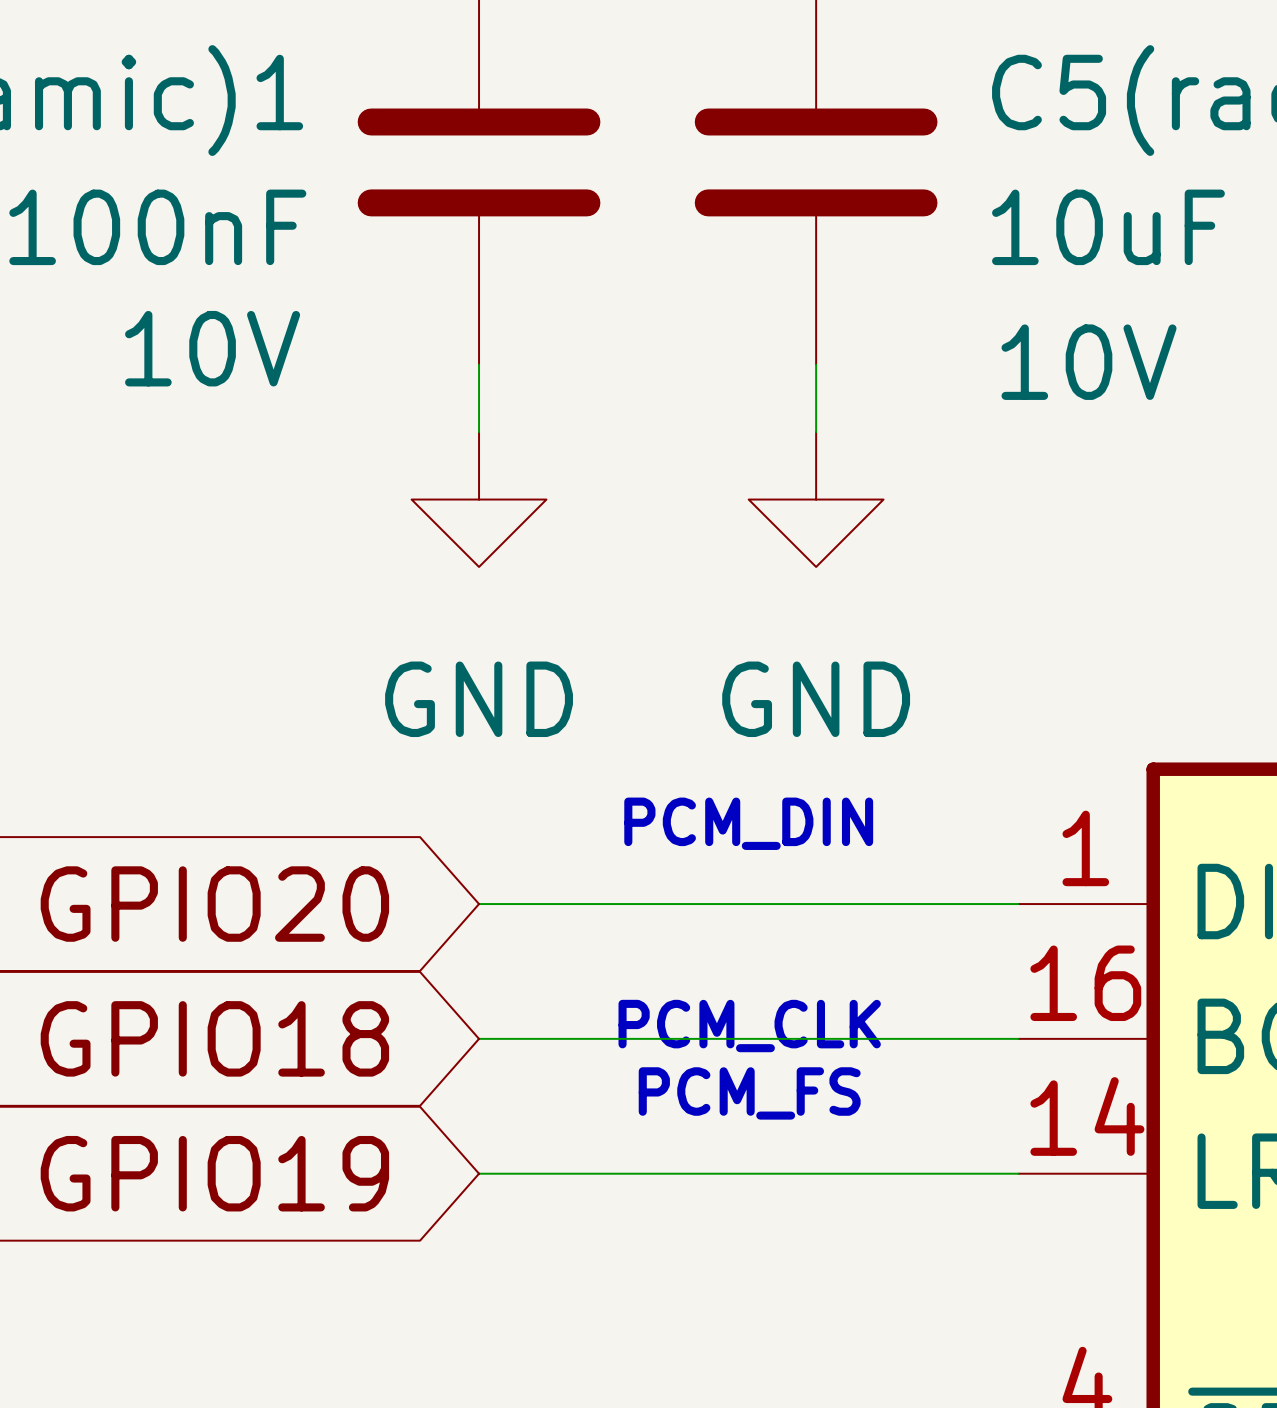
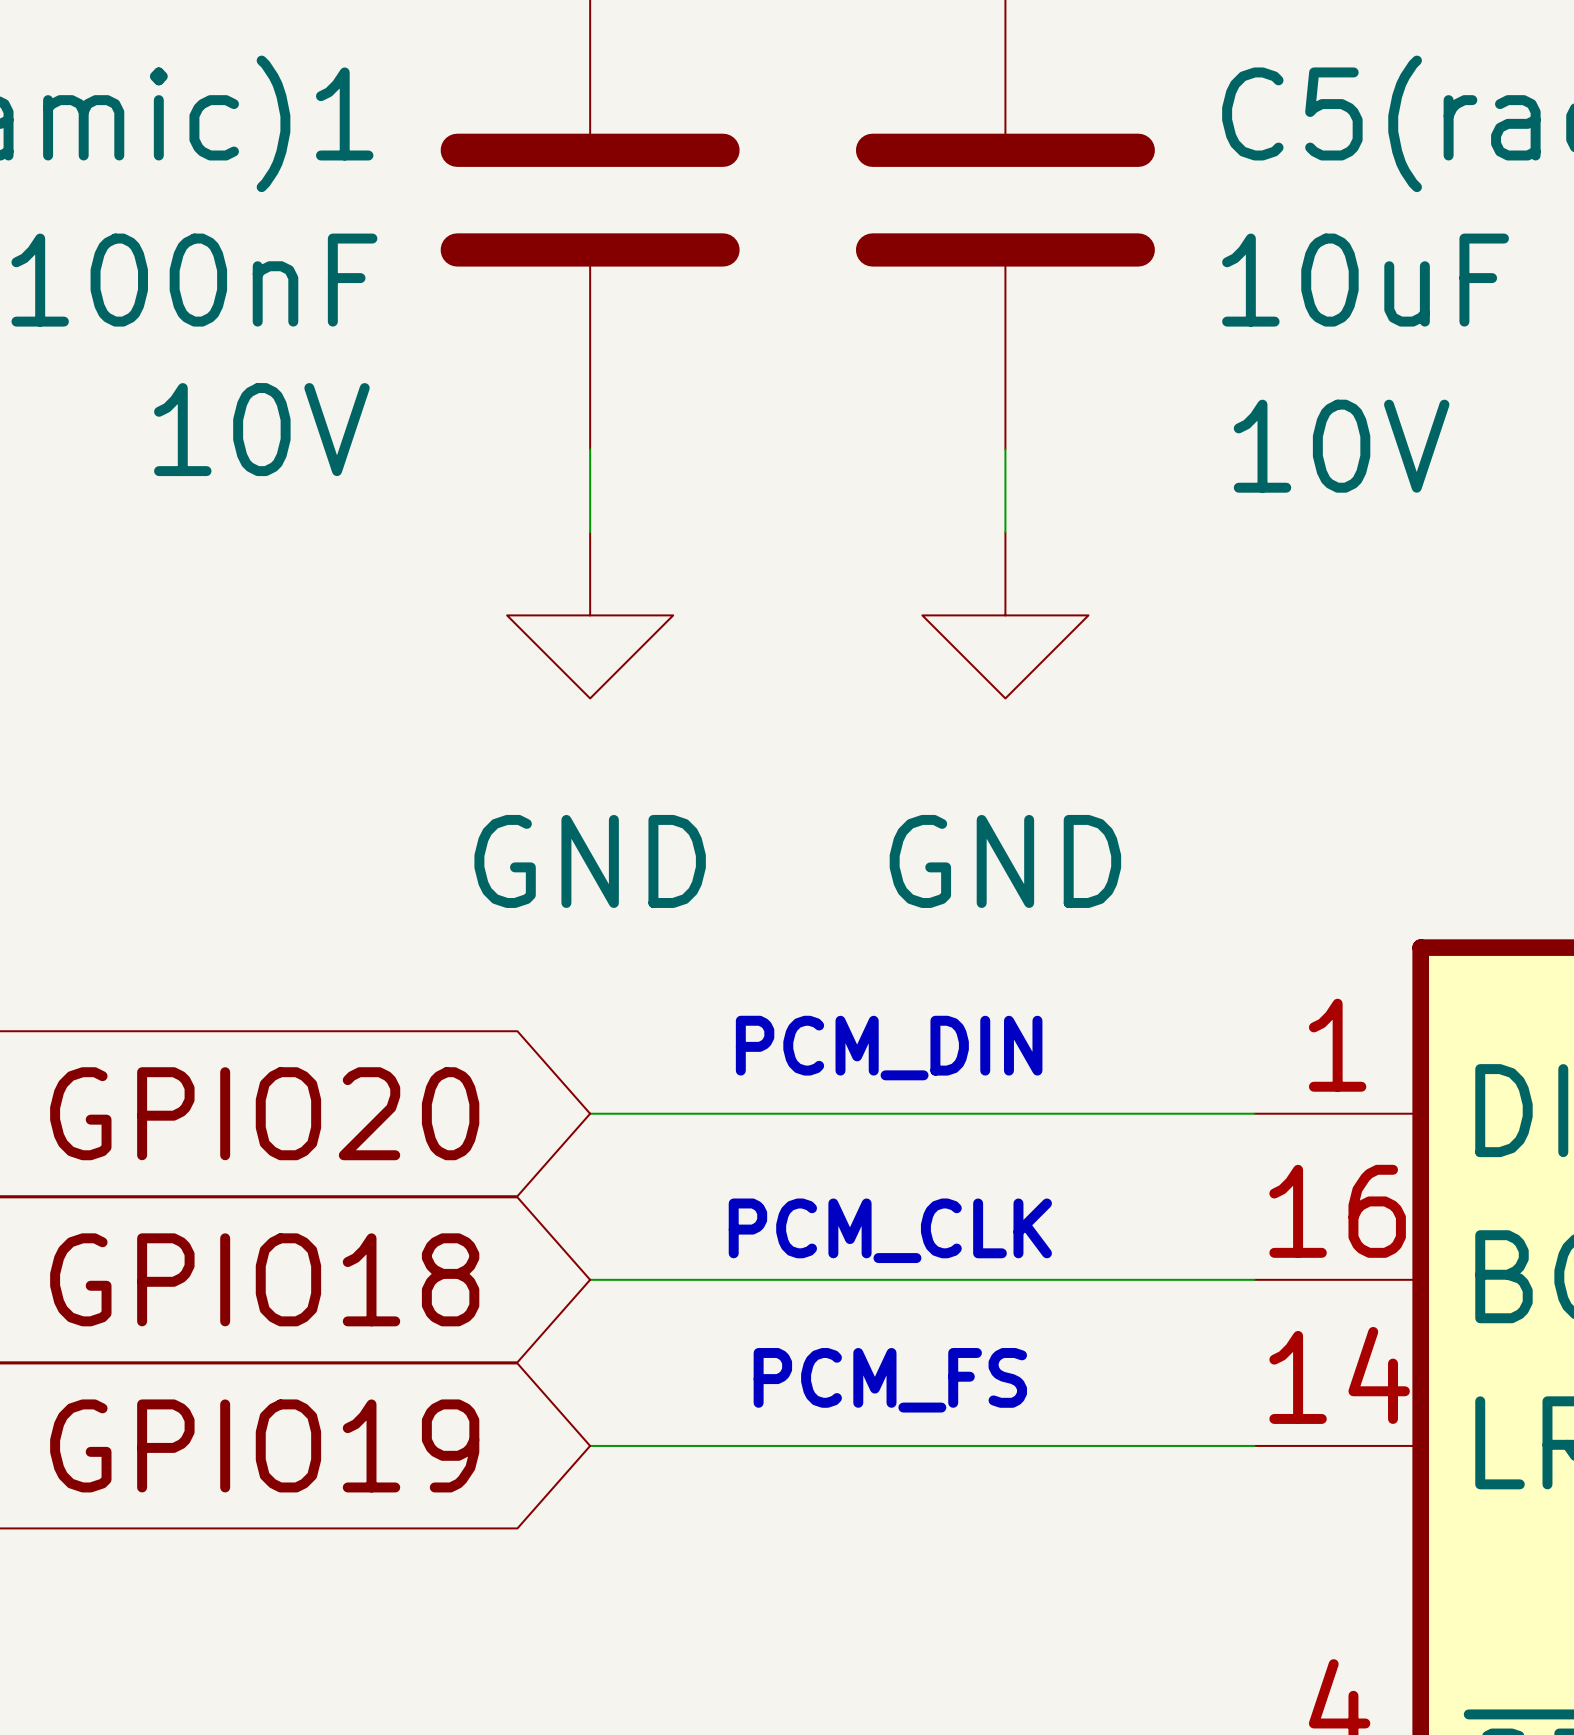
text position: PCM_DIN (748, 823) -> PCM_DIN (889, 1048)
text position: PCM_CLK (749, 1026) -> PCM_CLK (890, 1230)
text position: PCM_FS (749, 1093) -> PCM_FS (890, 1380)

